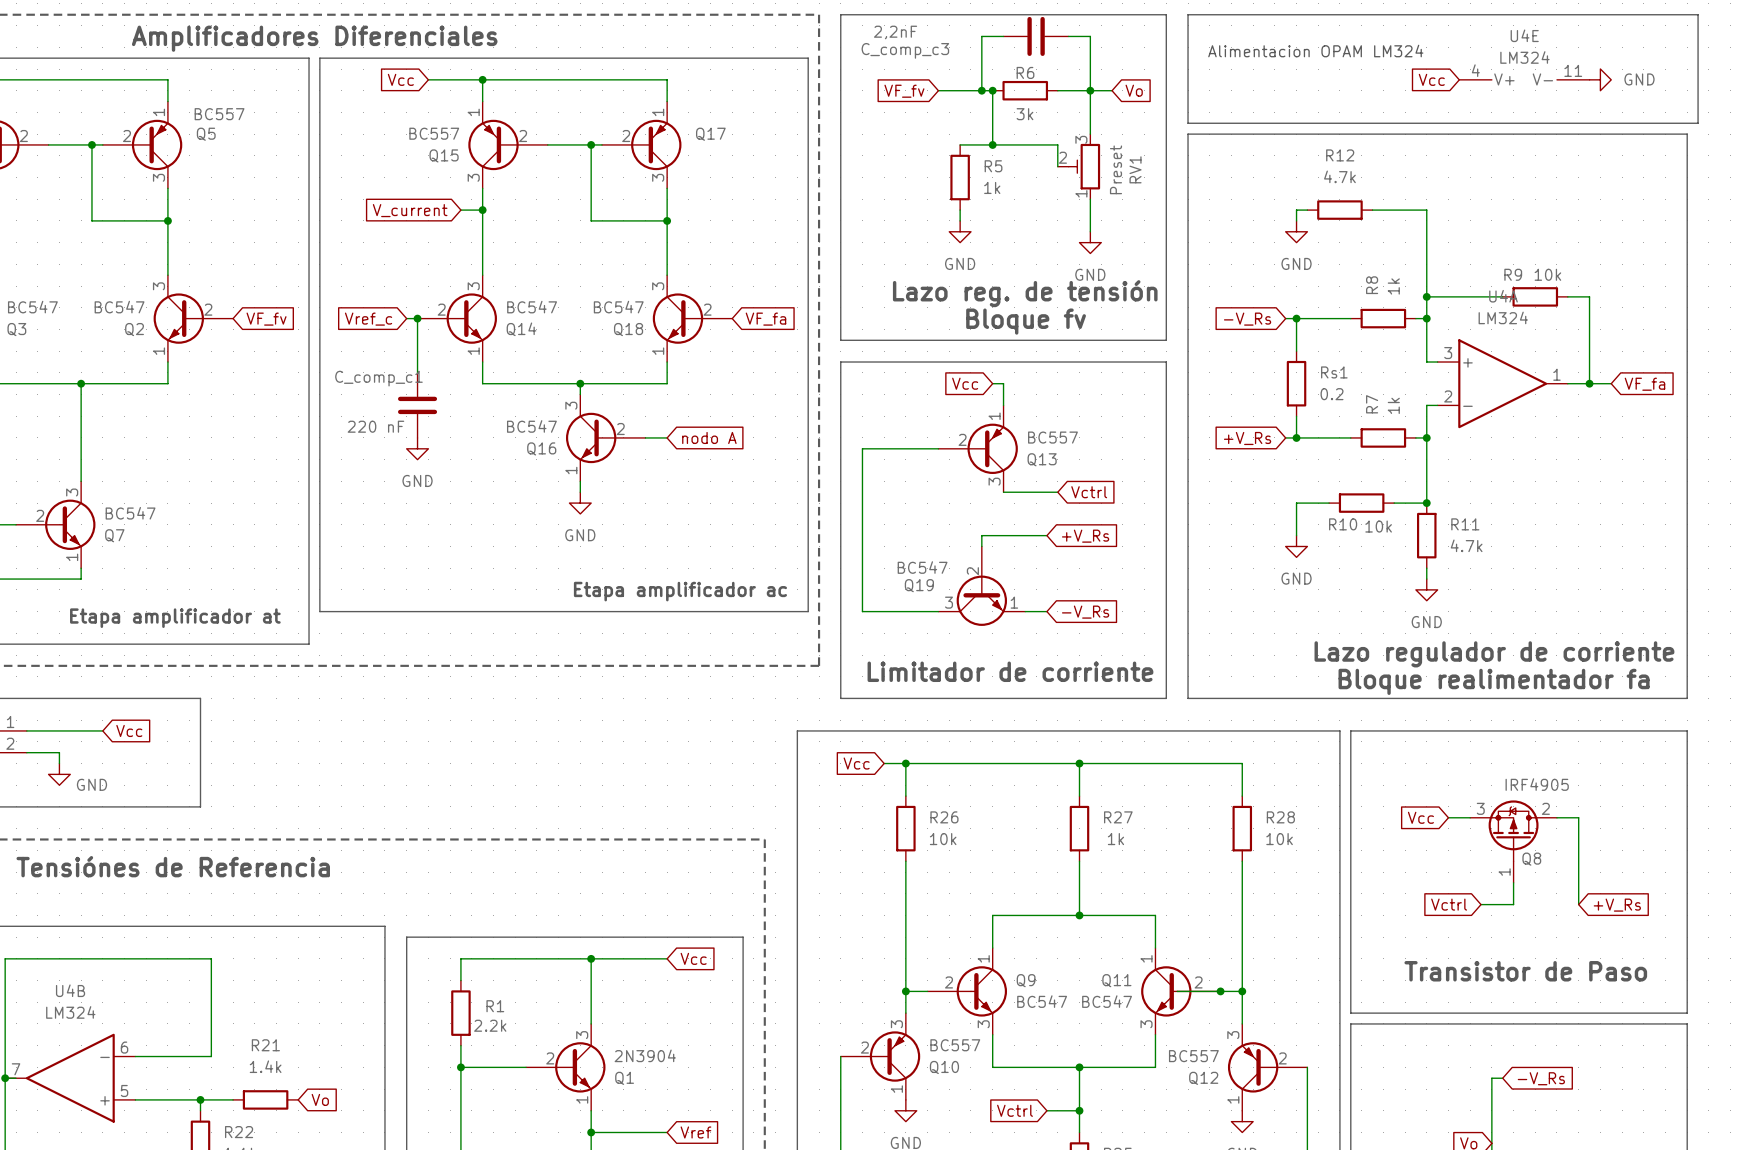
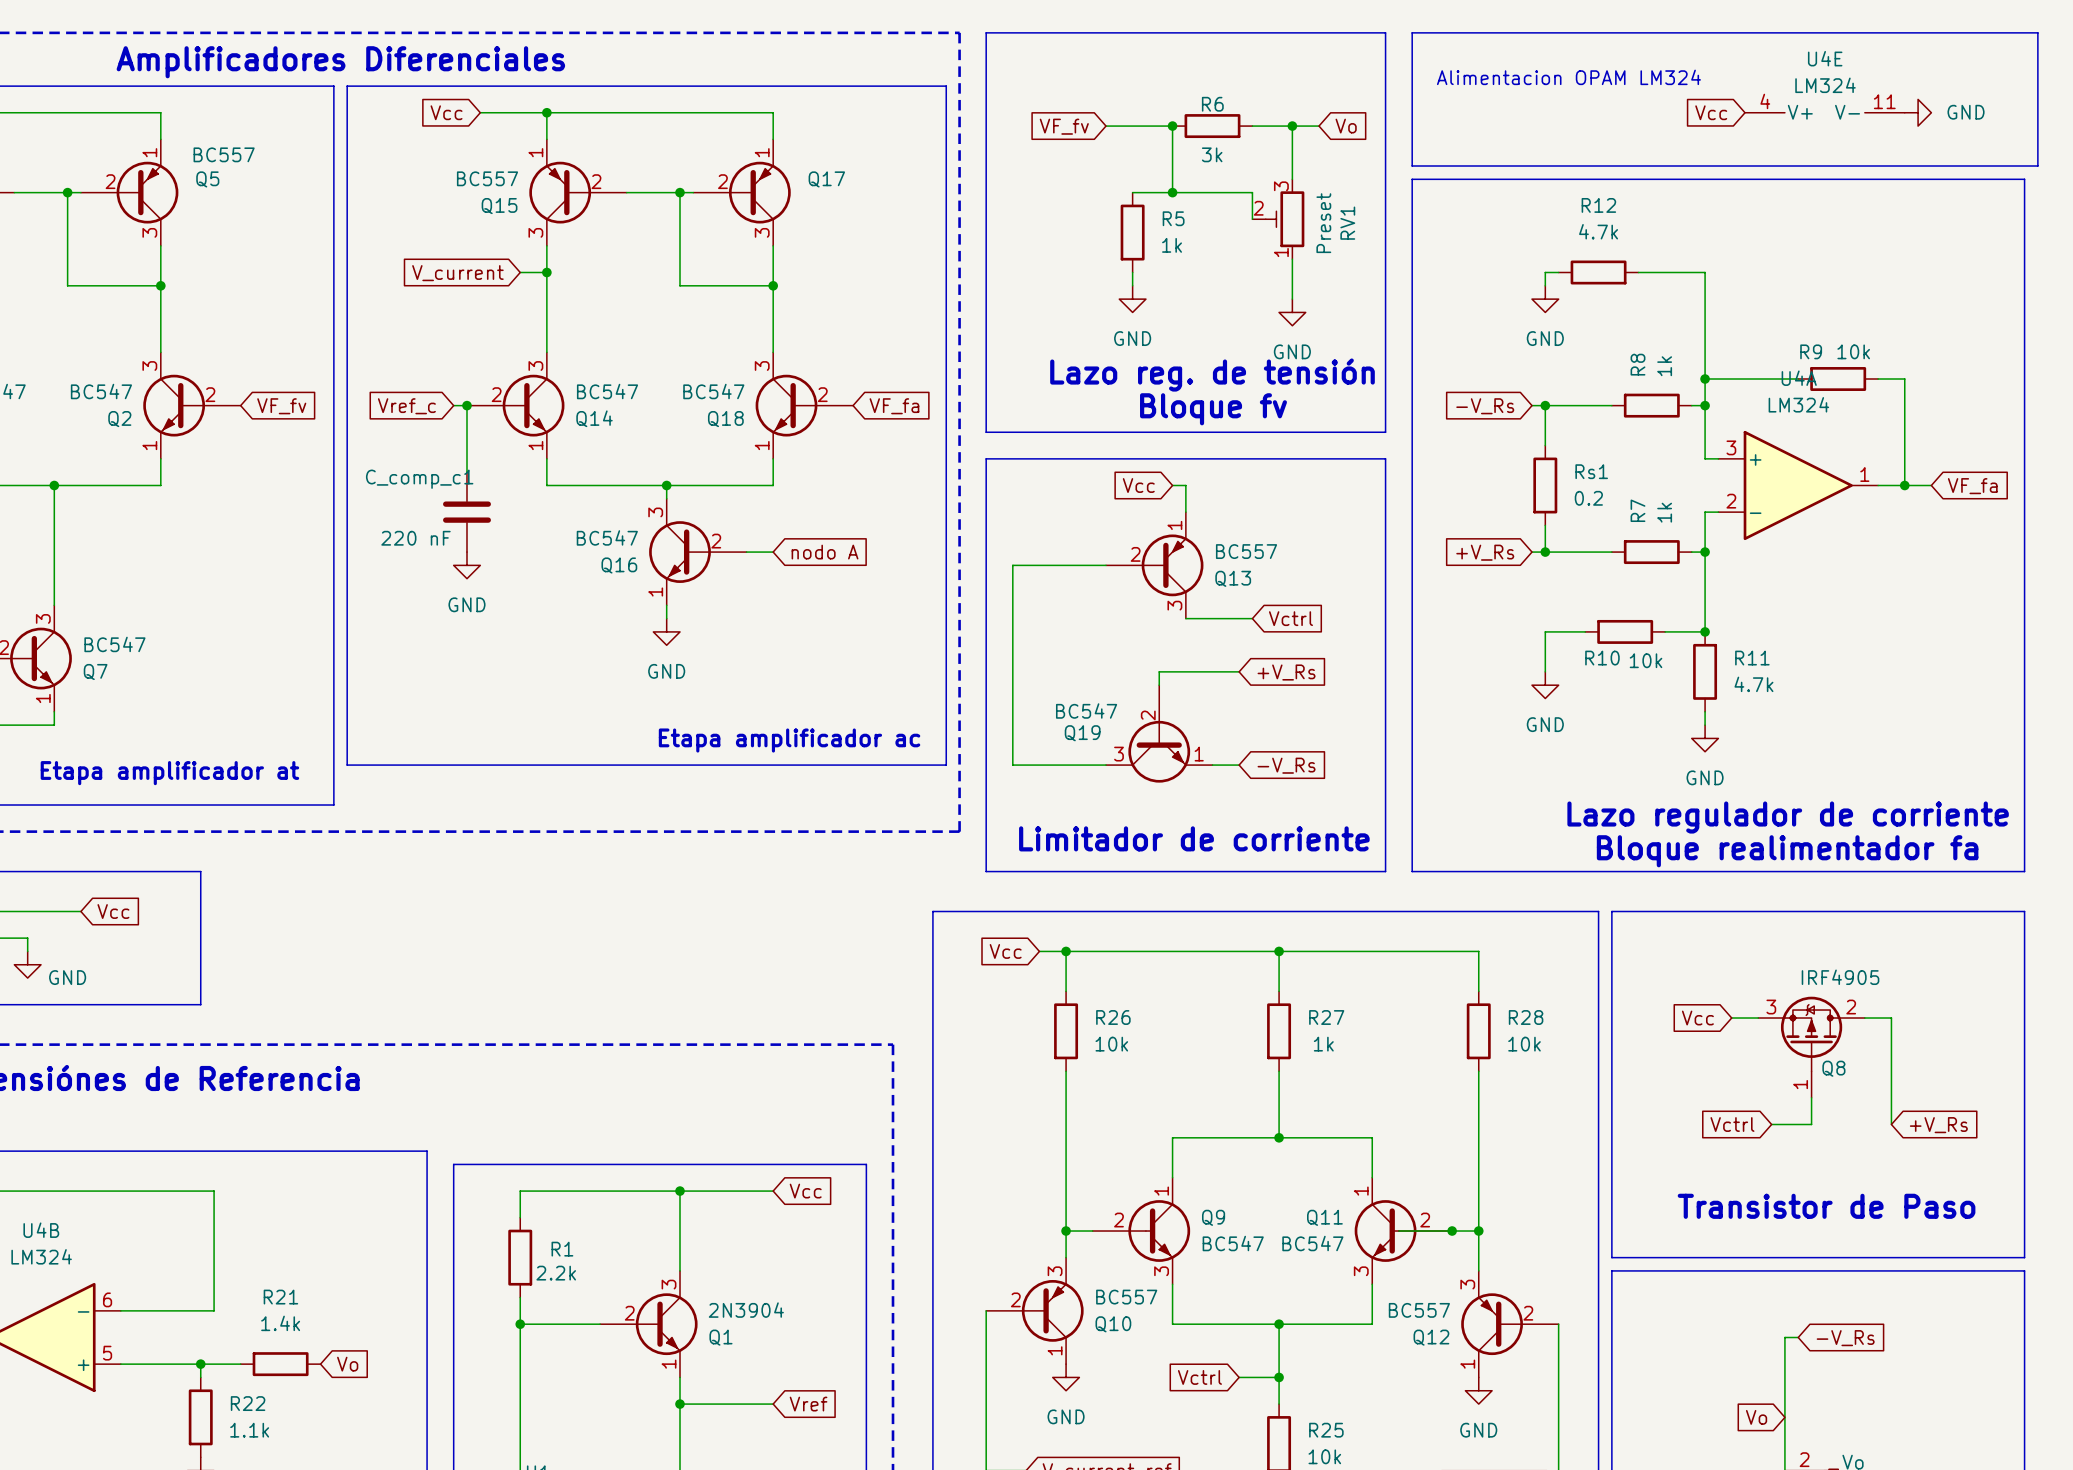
wire: (1003, 36) (981, 36) (981, 90) -> none
C_comp_c3: 2,2nF (1036, 36) -> none
wire: (1068, 36) (1090, 36) (1090, 90) -> none
junction: (981, 90) -> none

